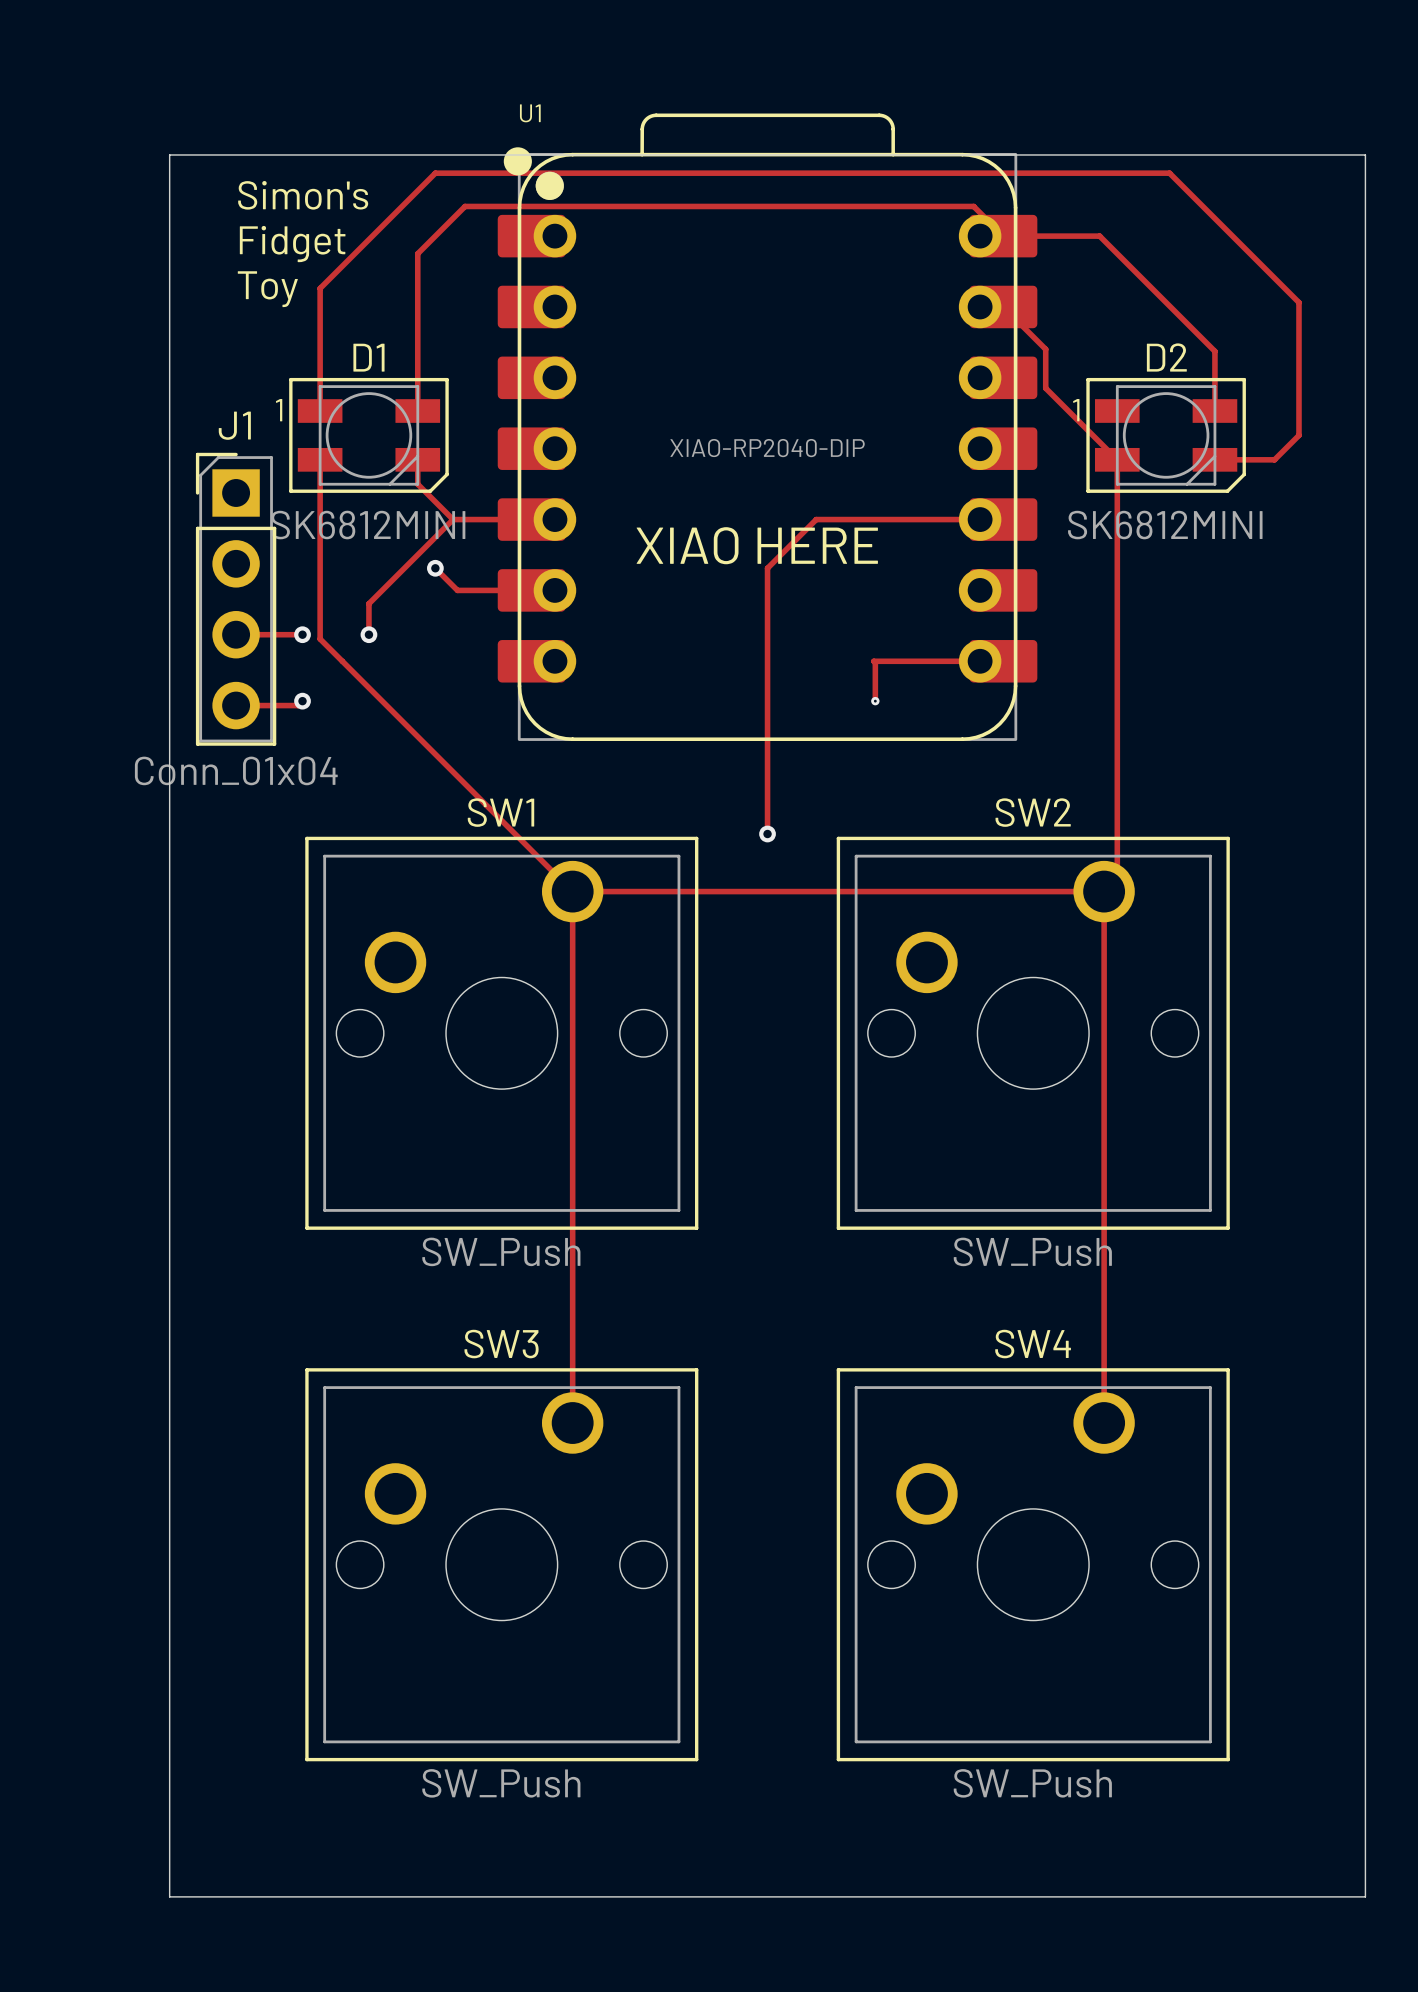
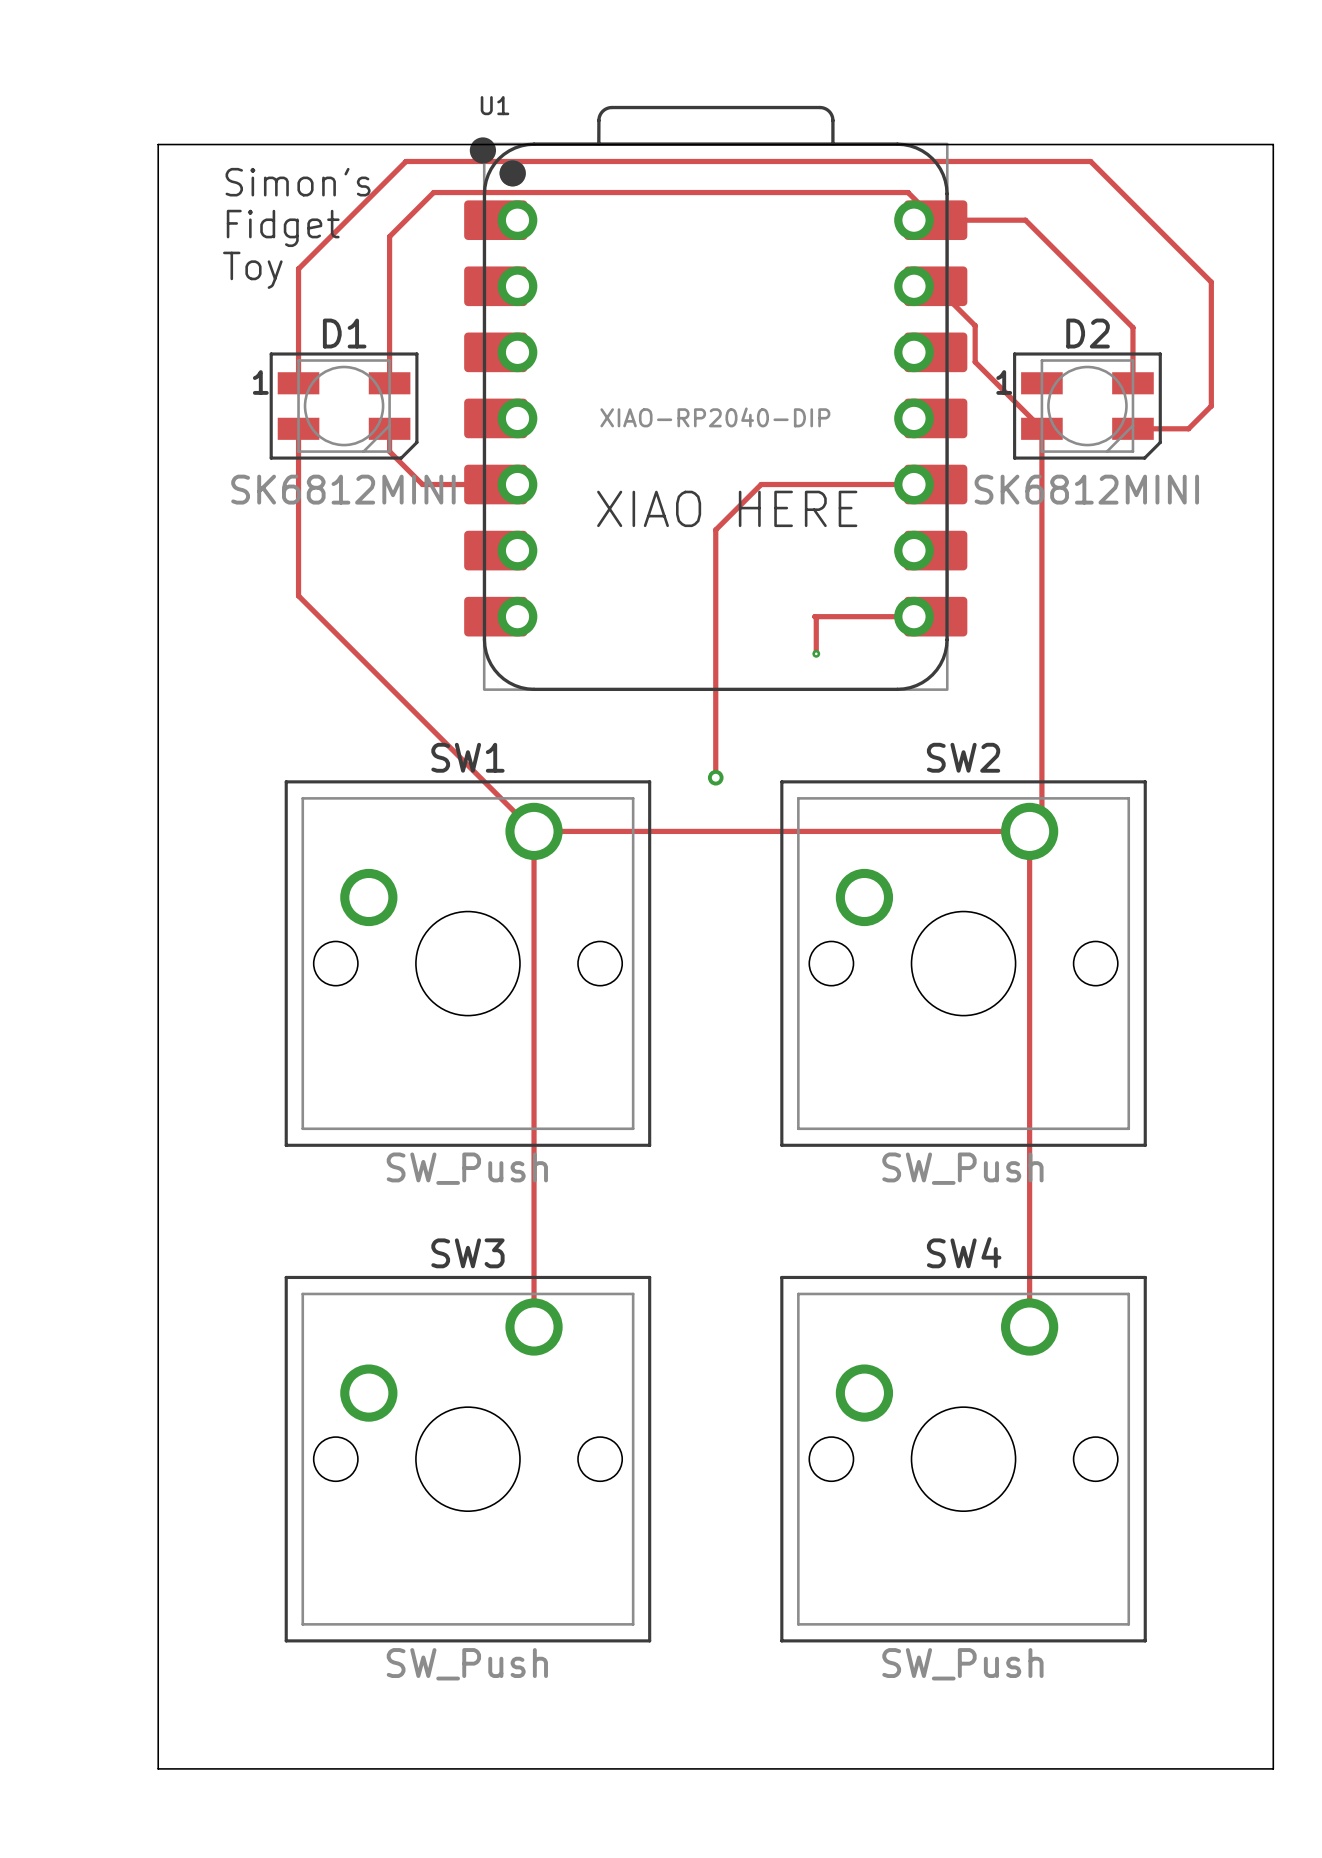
track: (453, 519) (368, 603) (368, 634) -> none
track: (435, 568) (457, 590) (531, 590) -> none
via: (435, 568) -> none
J1: Conn_01x04 (236, 599) -> none
track: (236, 634) (302, 634) -> none
via: (302, 634) -> none
via: (368, 634) -> none
track: (302, 701) (298, 705) (236, 705) -> none
via: (302, 701) -> none

